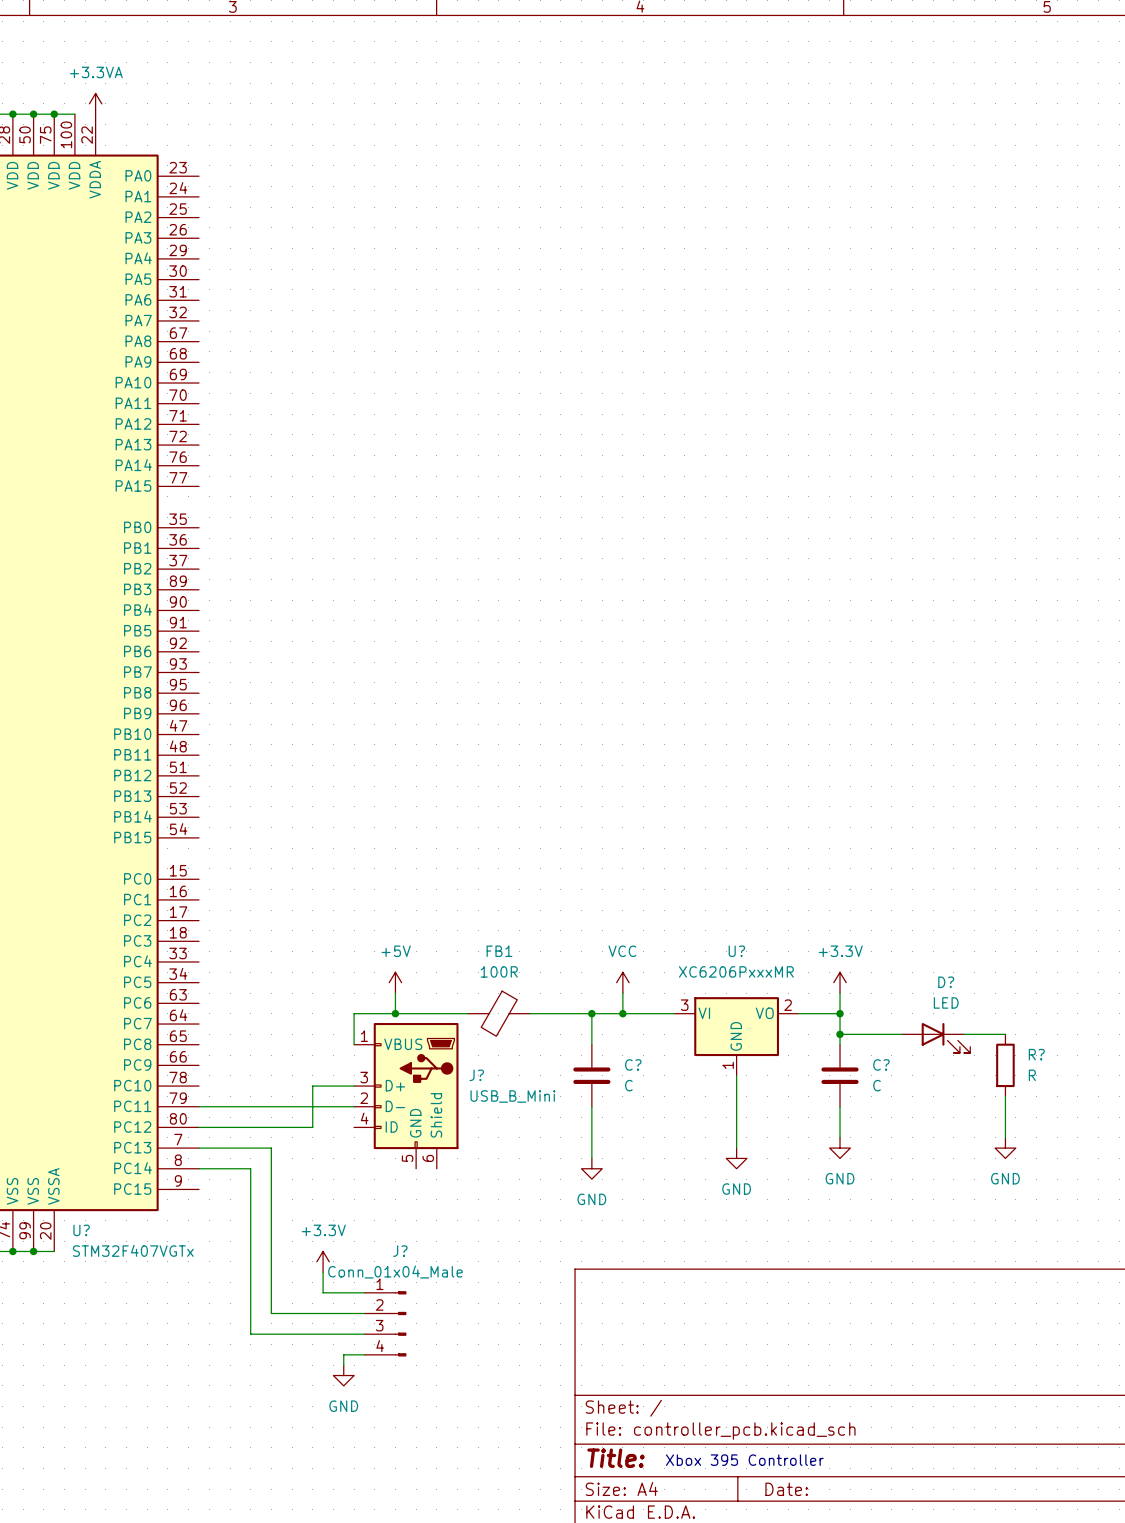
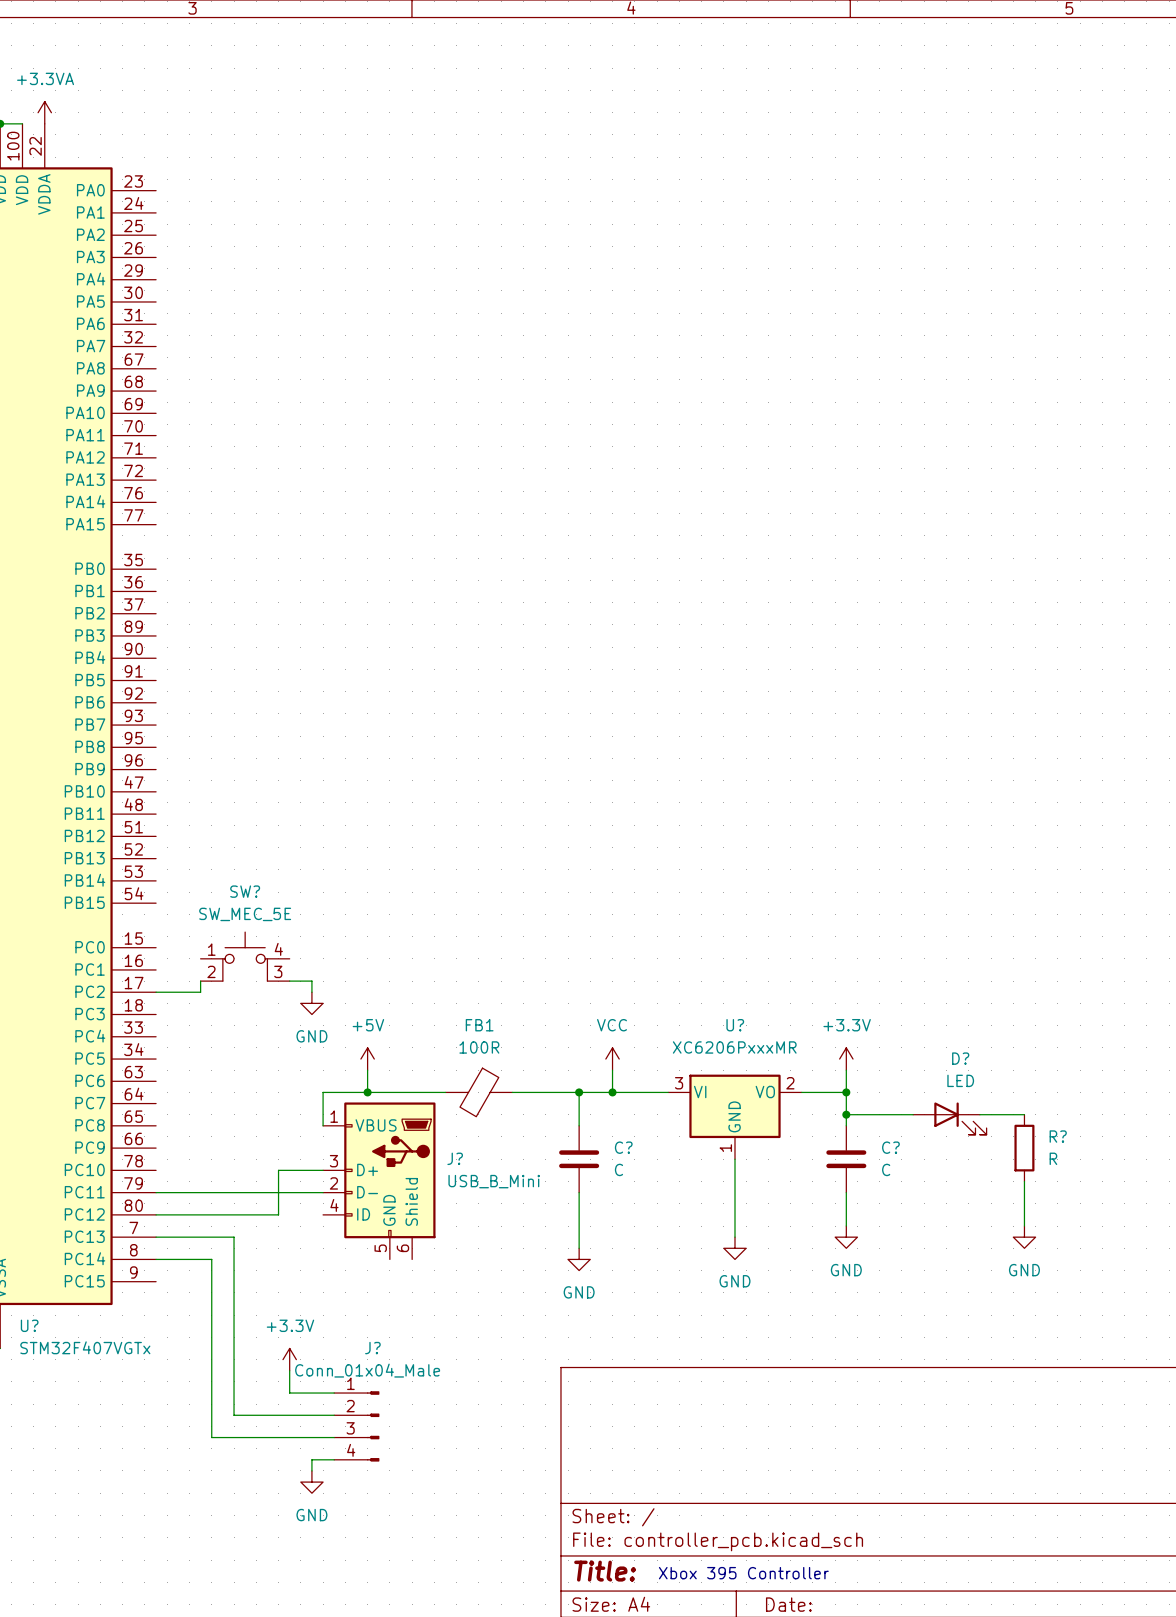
SW?: none -> SW_MEC_5E (245, 956)
wire: none -> (200, 981) (200, 992) (156, 992)
wire: none -> (289, 981) (311, 981) (311, 992)
power symbol: none -> GND (311, 1003)

